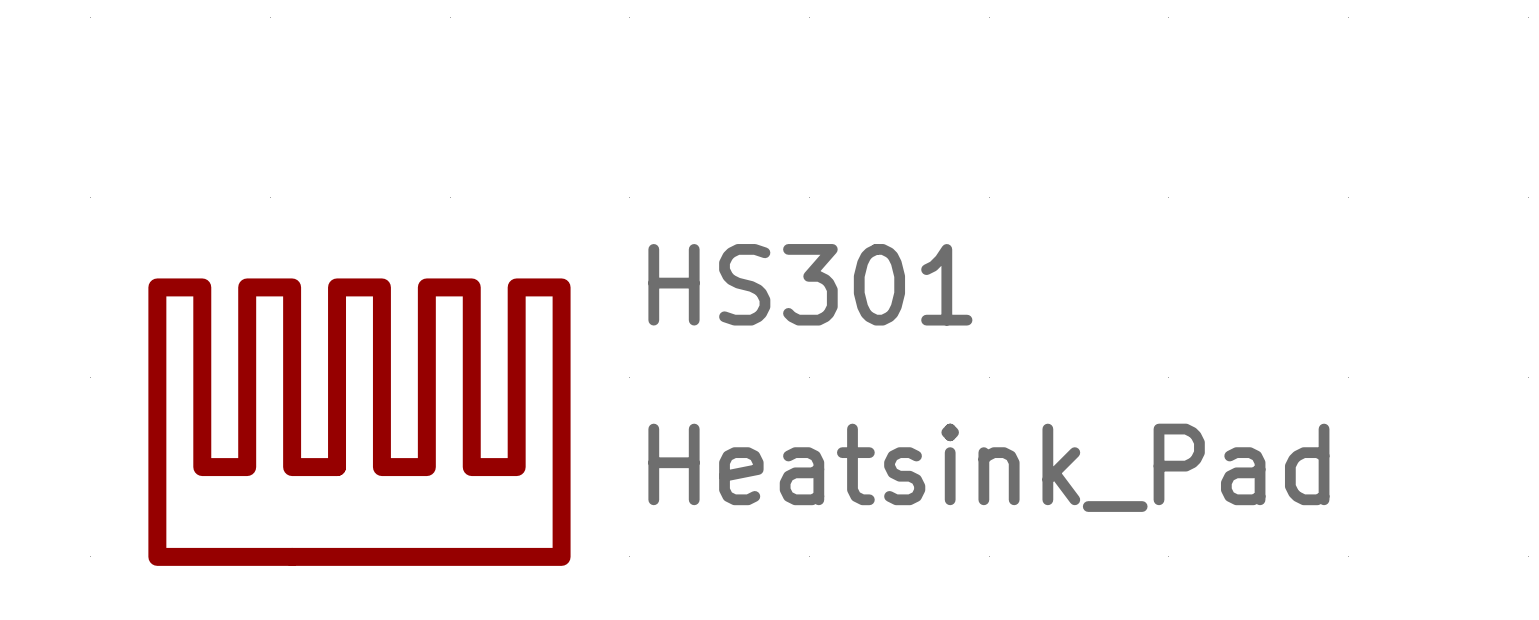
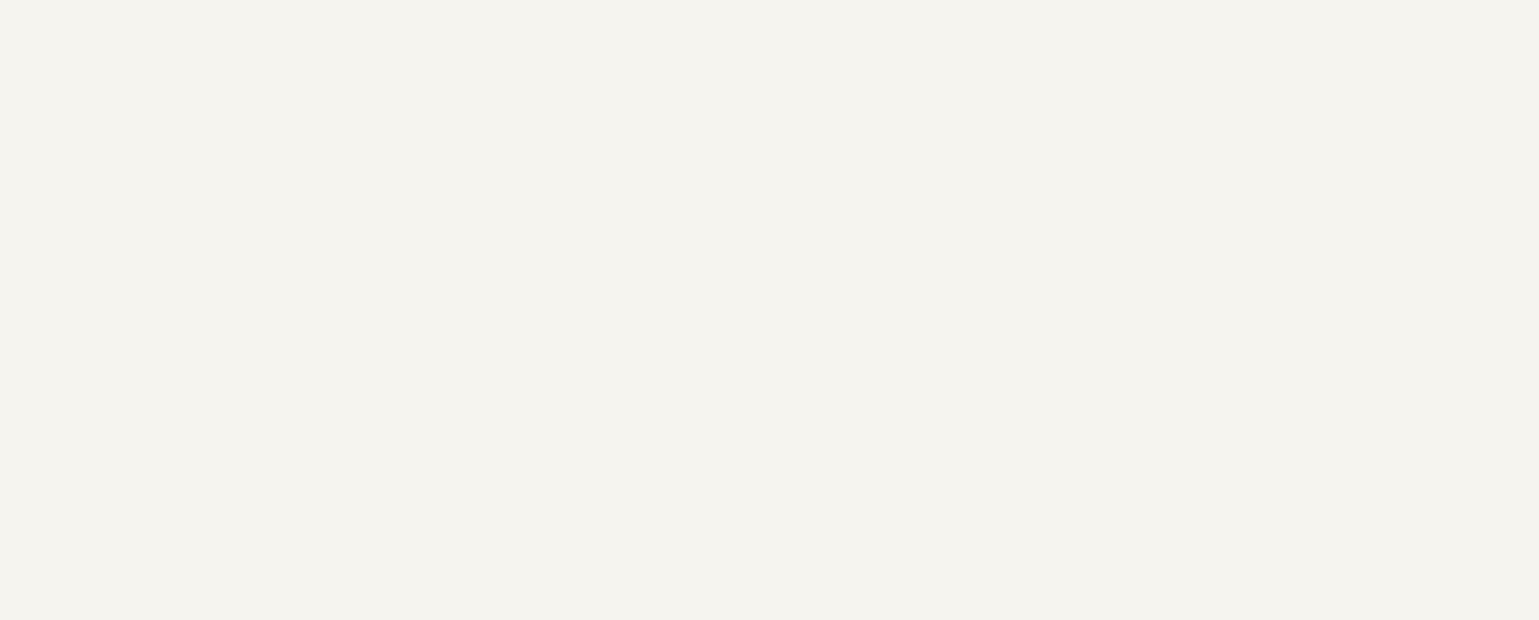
HS301: Heatsink_Pad (359, 422) -> none

